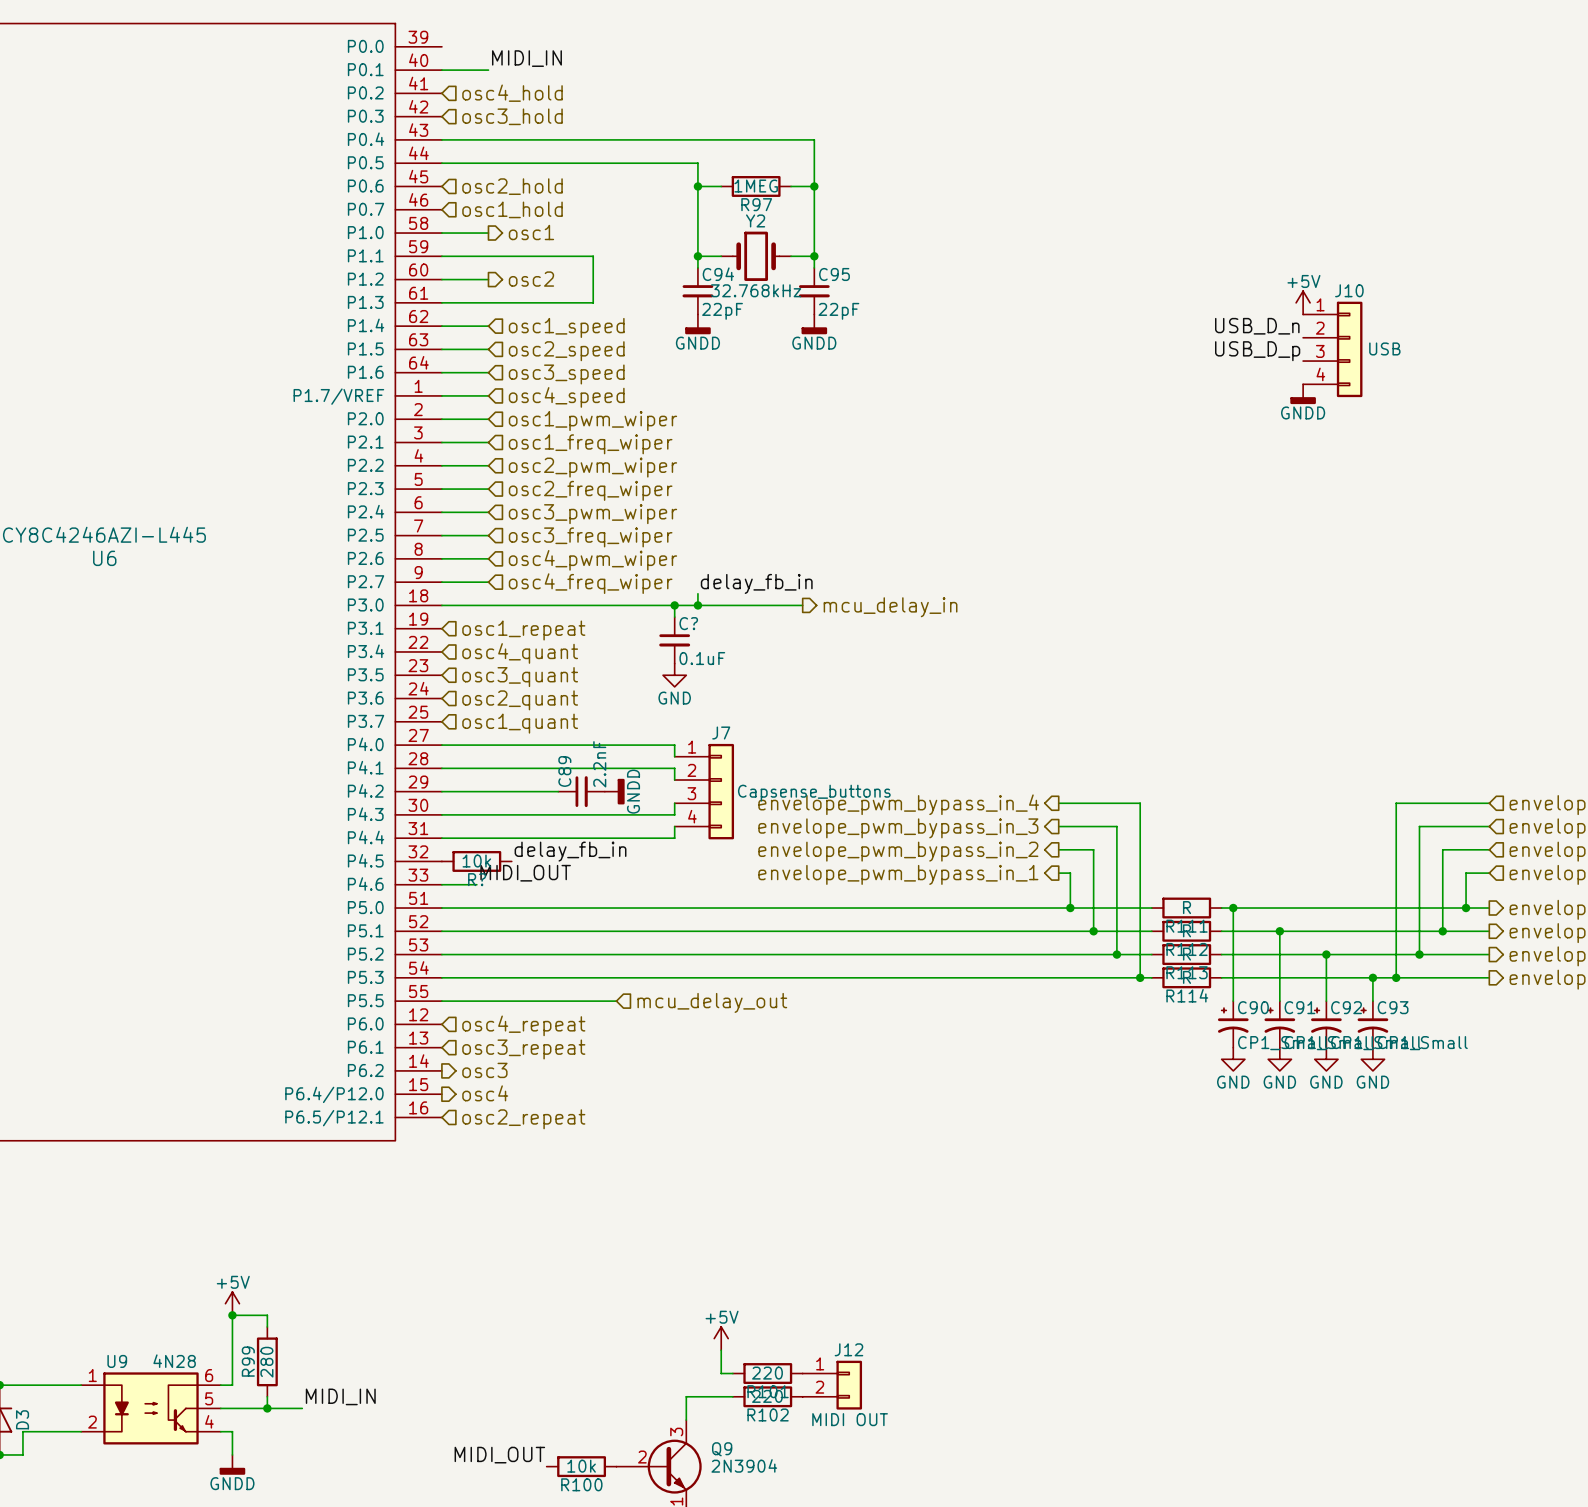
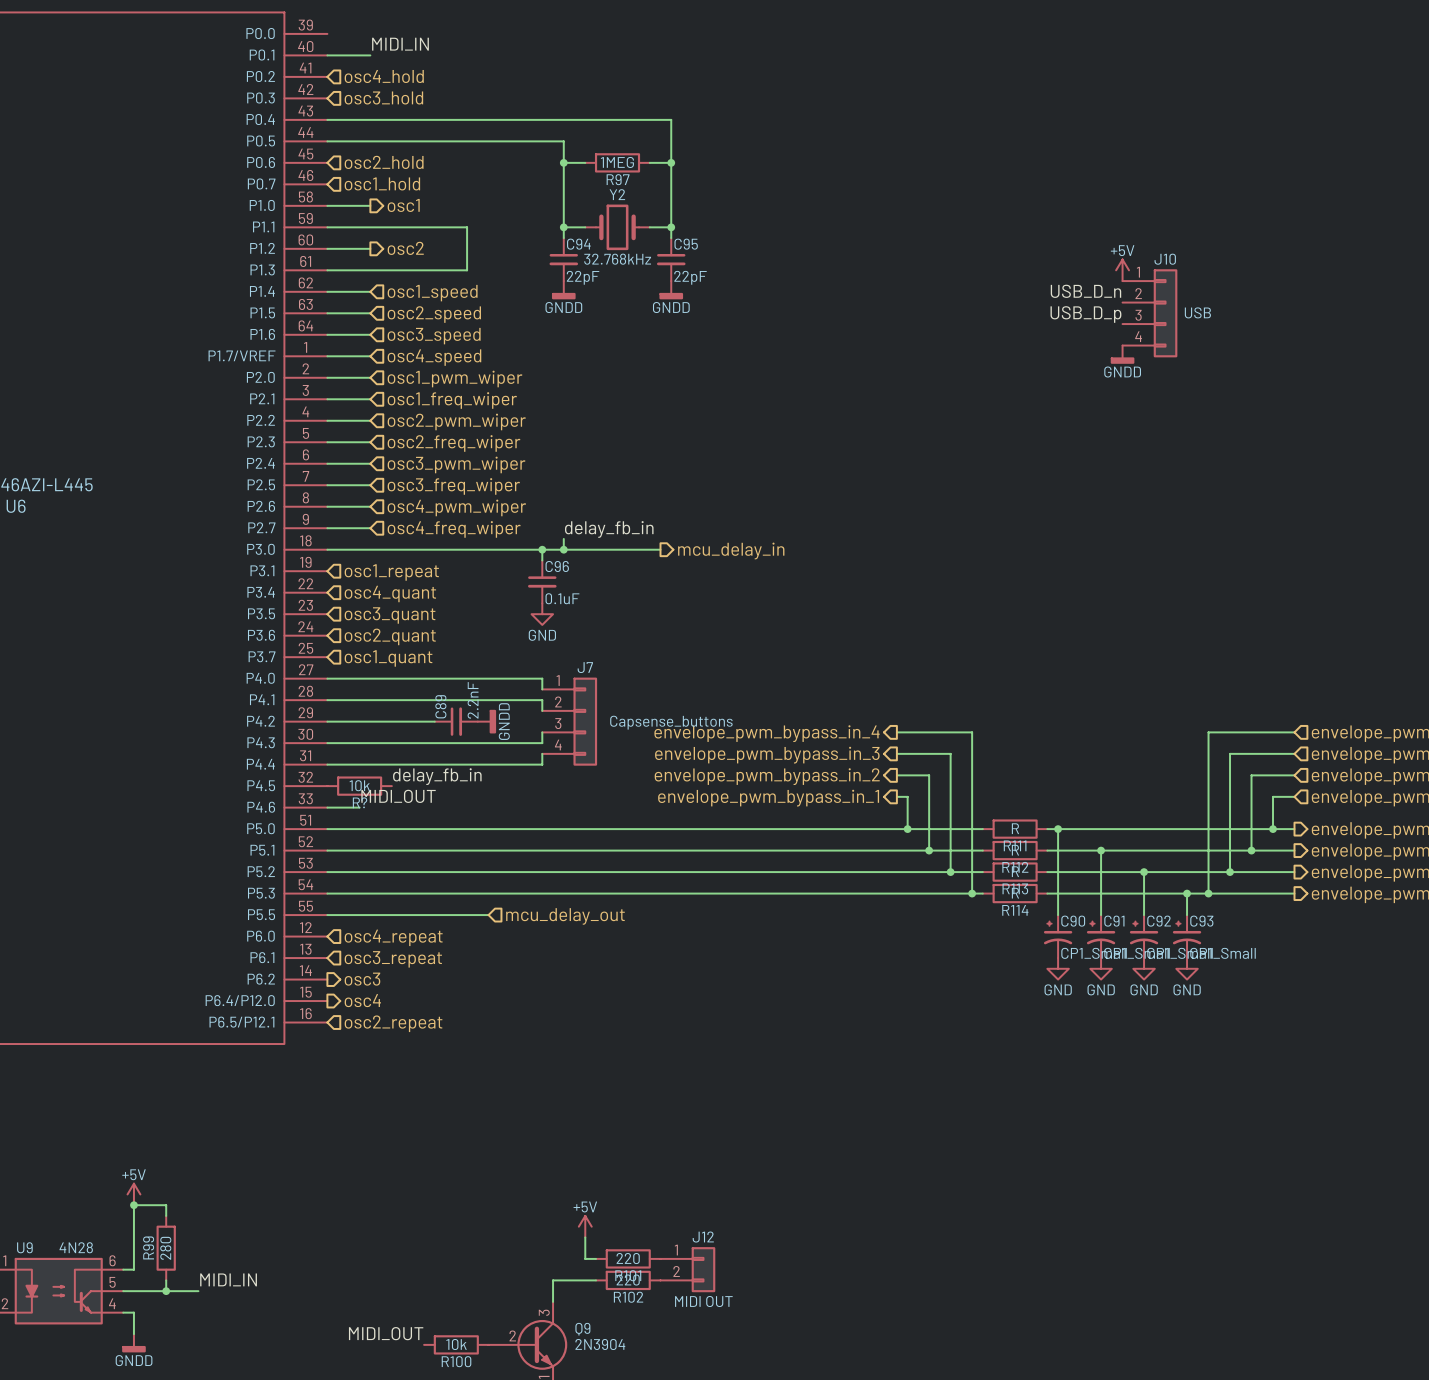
C? name: C? (688, 623) -> C96 (557, 566)

